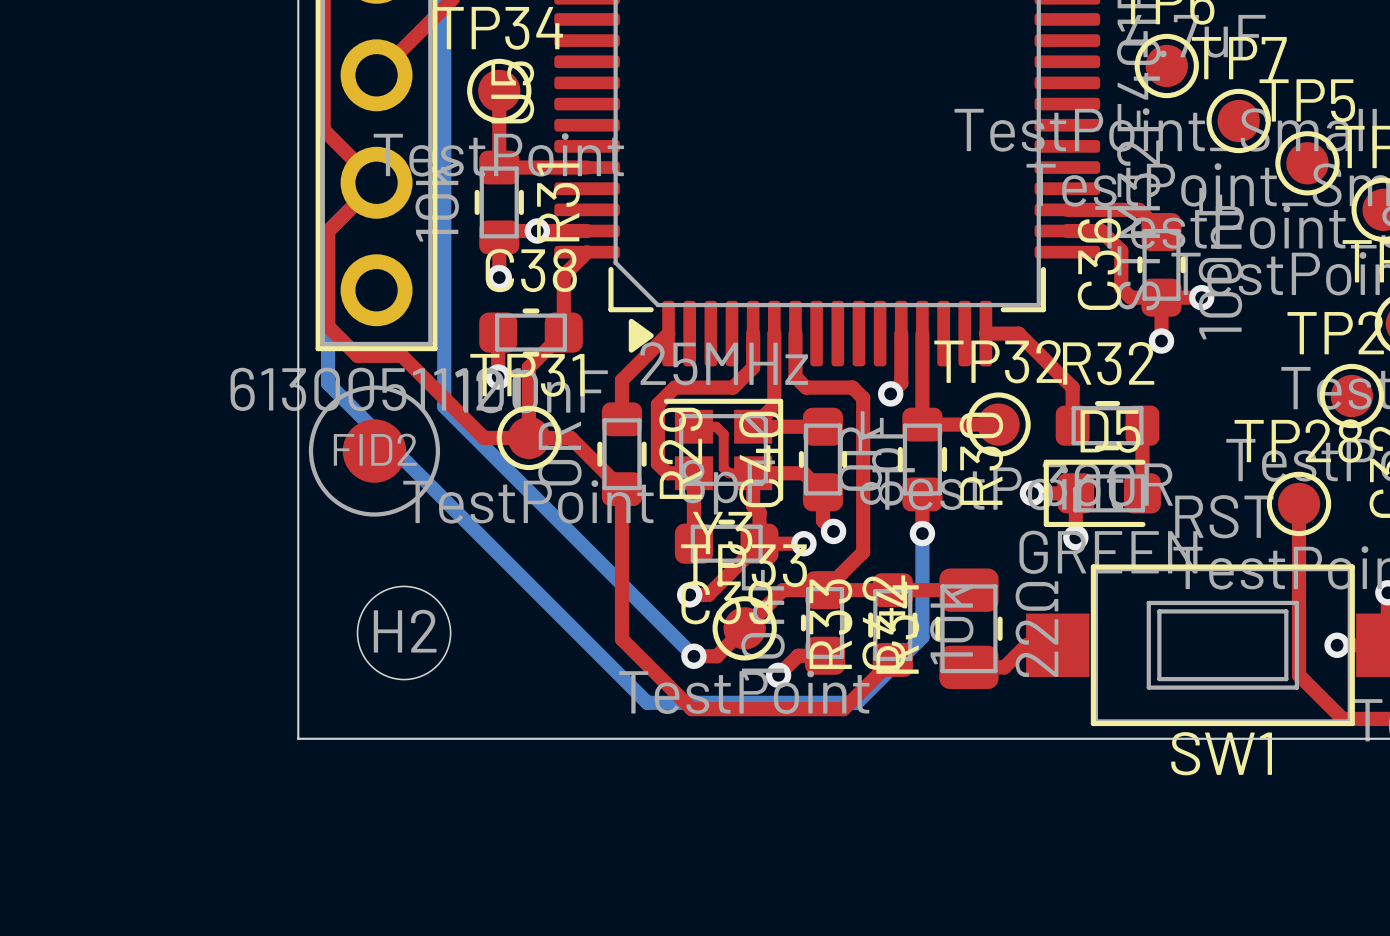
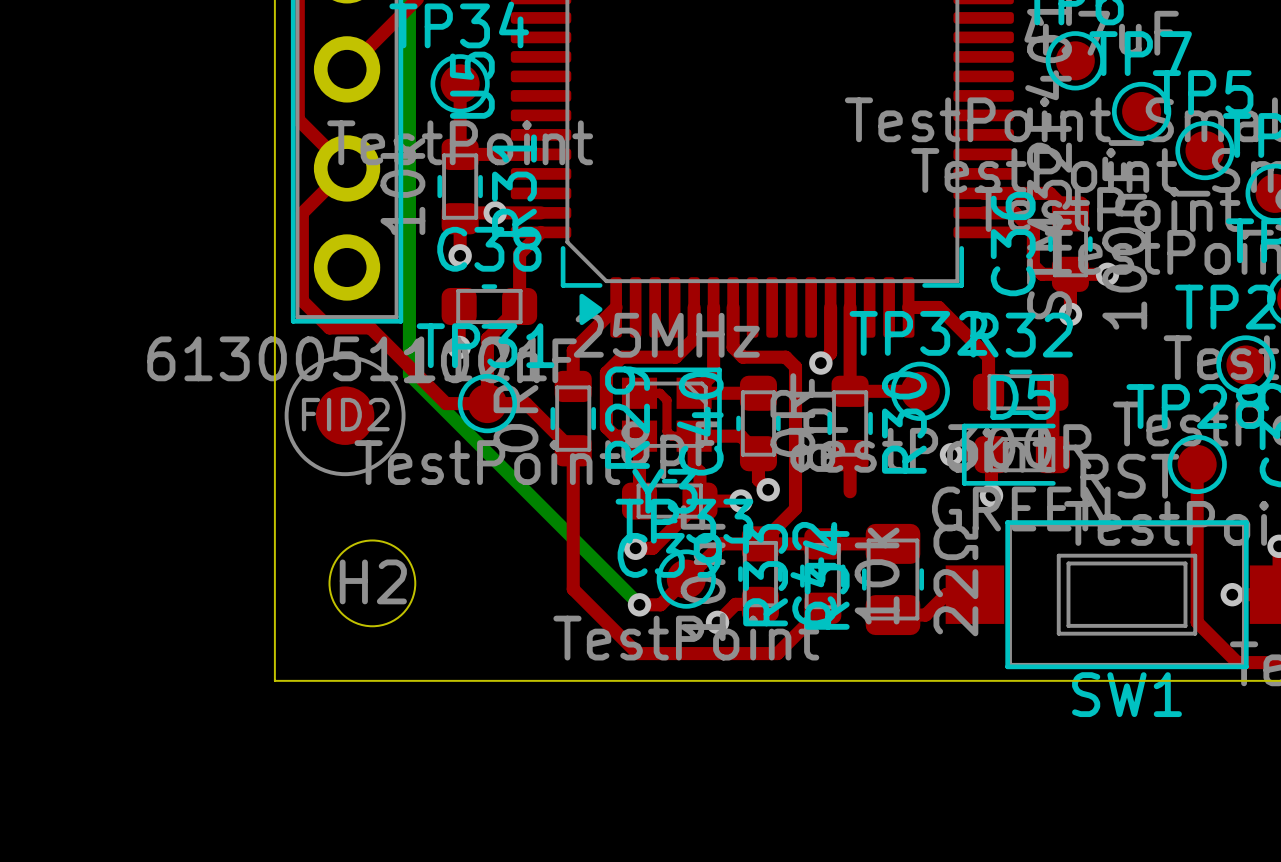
bottom track: (376, 182) (328, 231) (328, 383) (647, 702) (856, 702) (922, 637) (922, 533) -> none
via: (922, 533) -> none

